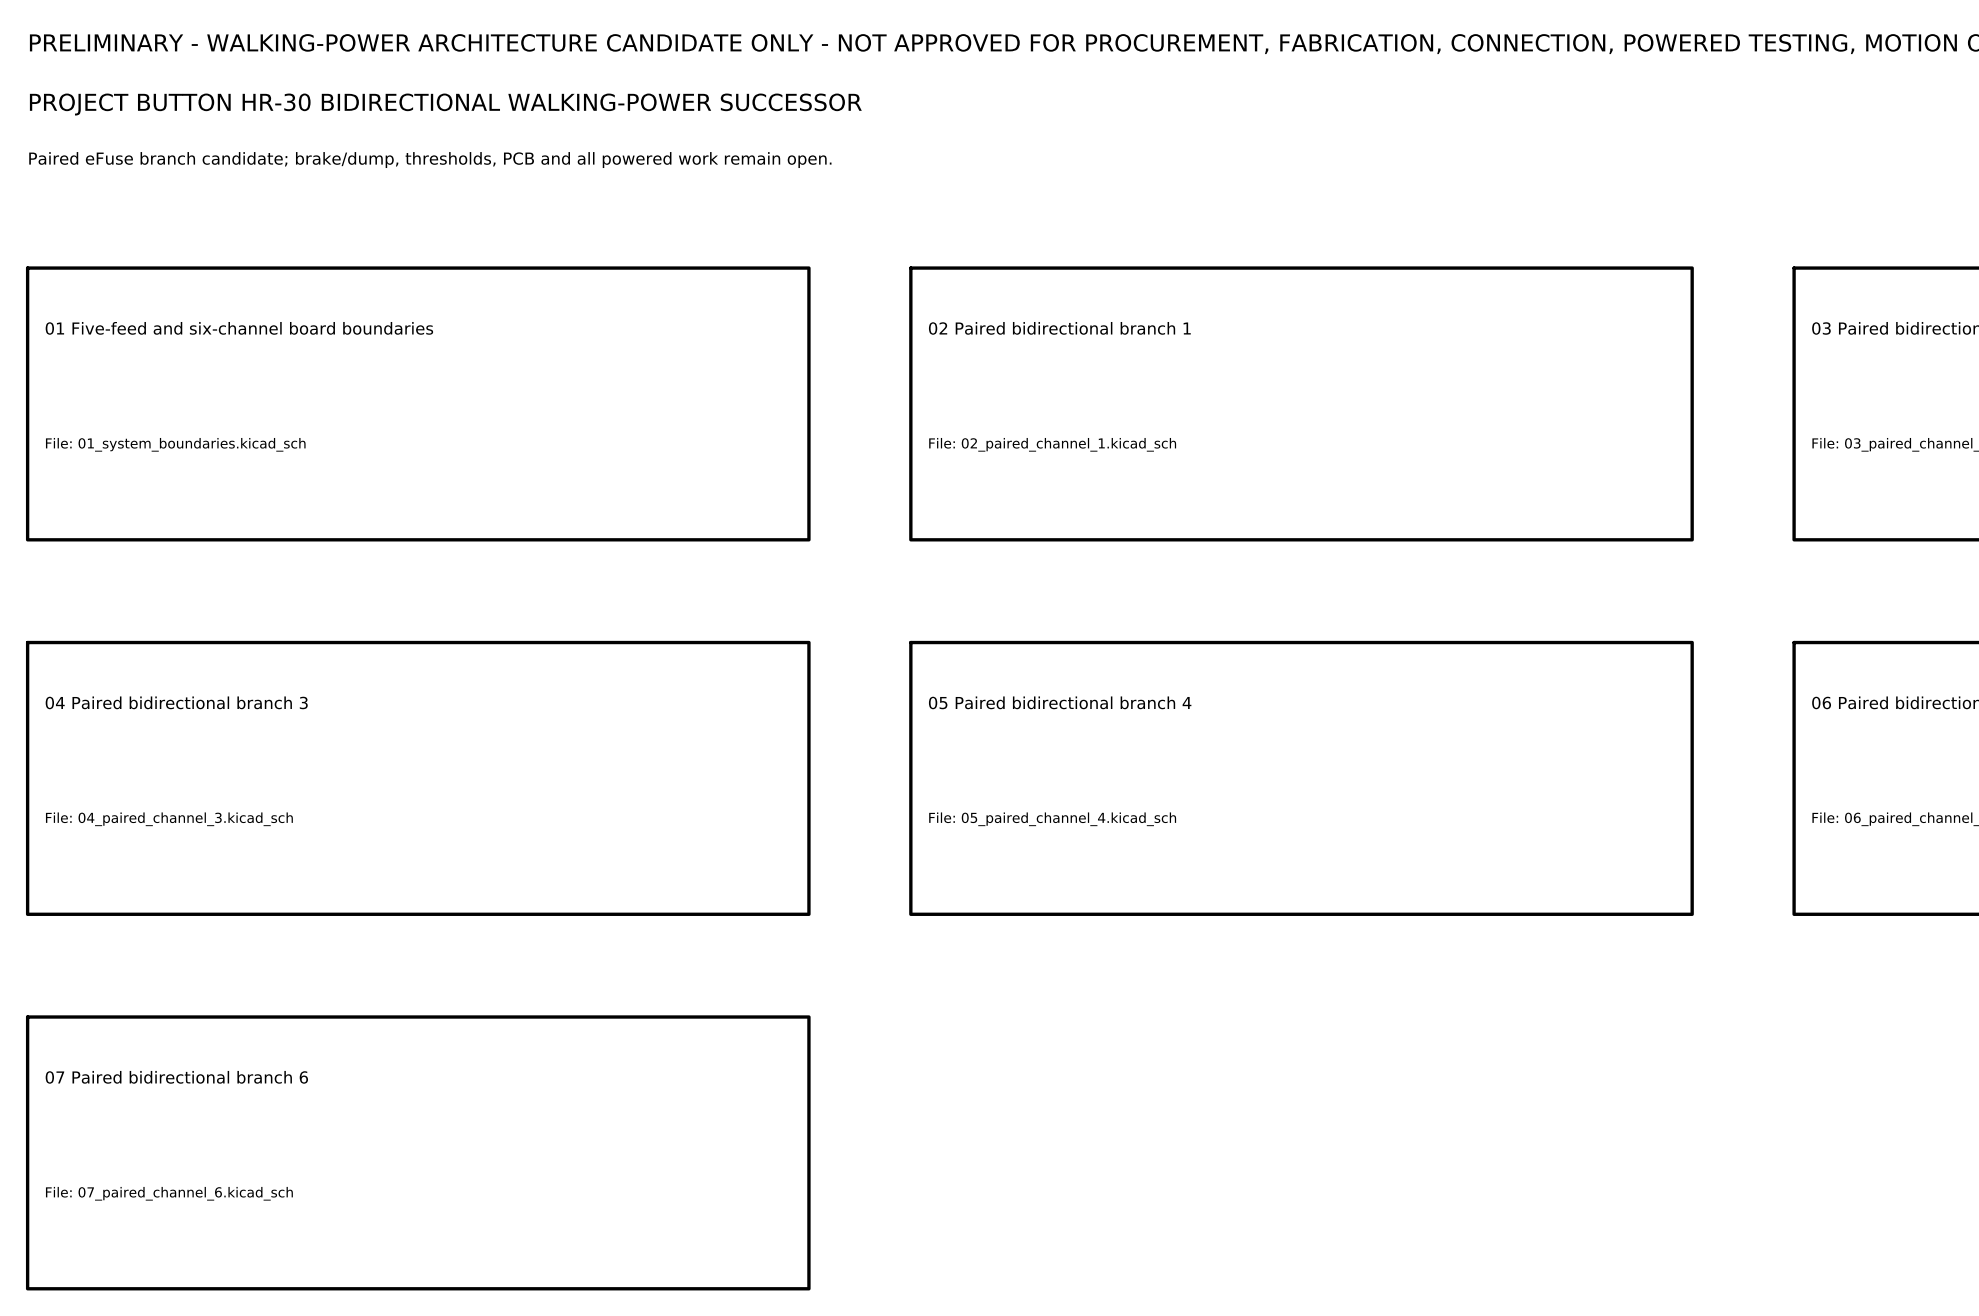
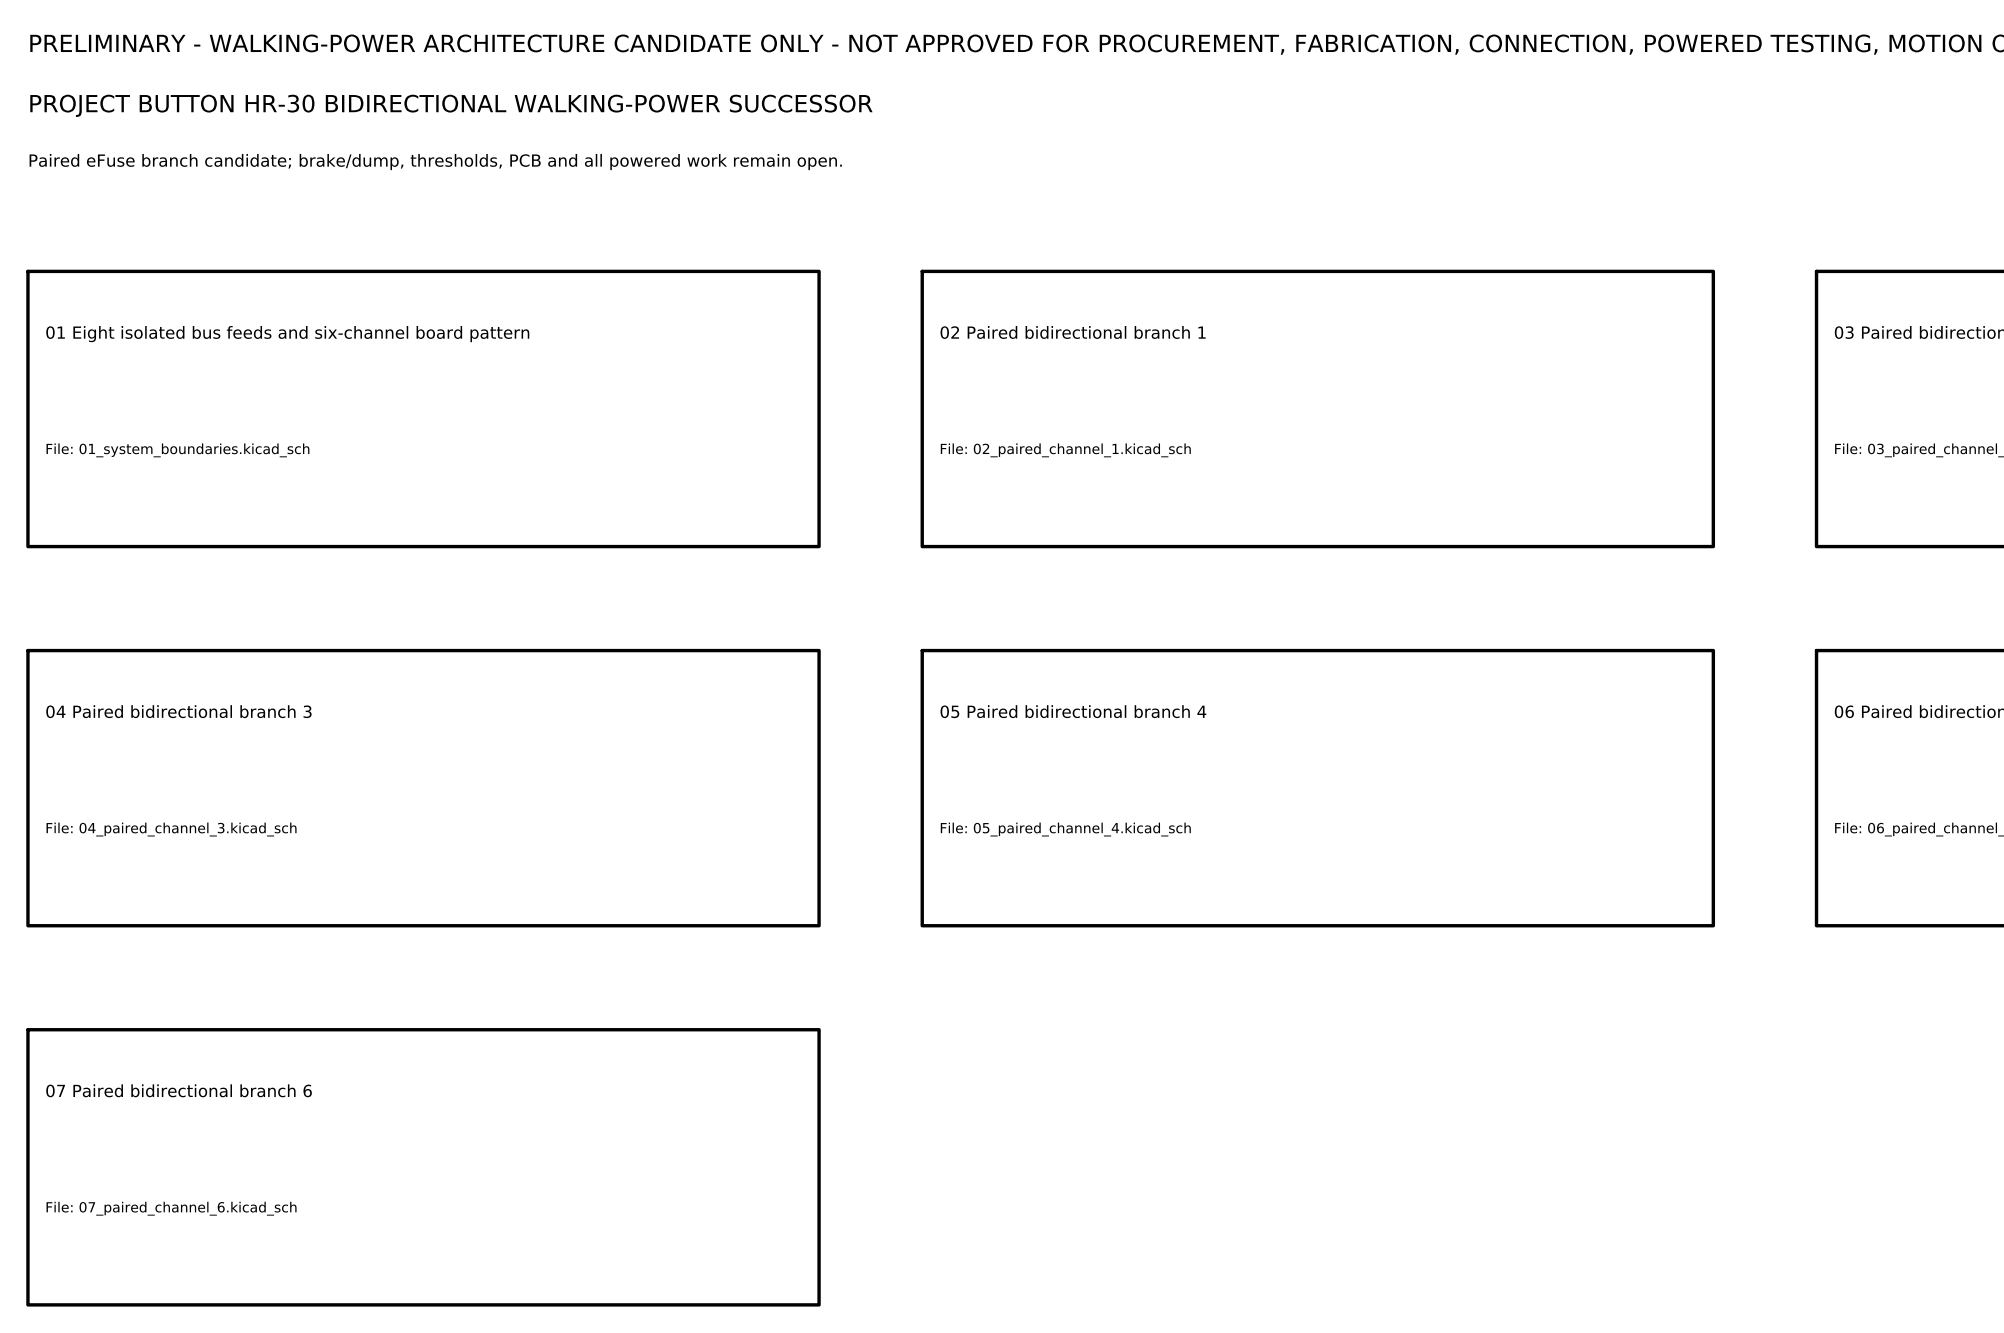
sheet 01 Five-feed and six-channel board boundaries name: 01 Five-feed and six-channel board boundaries (239, 328) -> 01 Eight isolated bus feeds and six-channel board pattern (287, 334)

